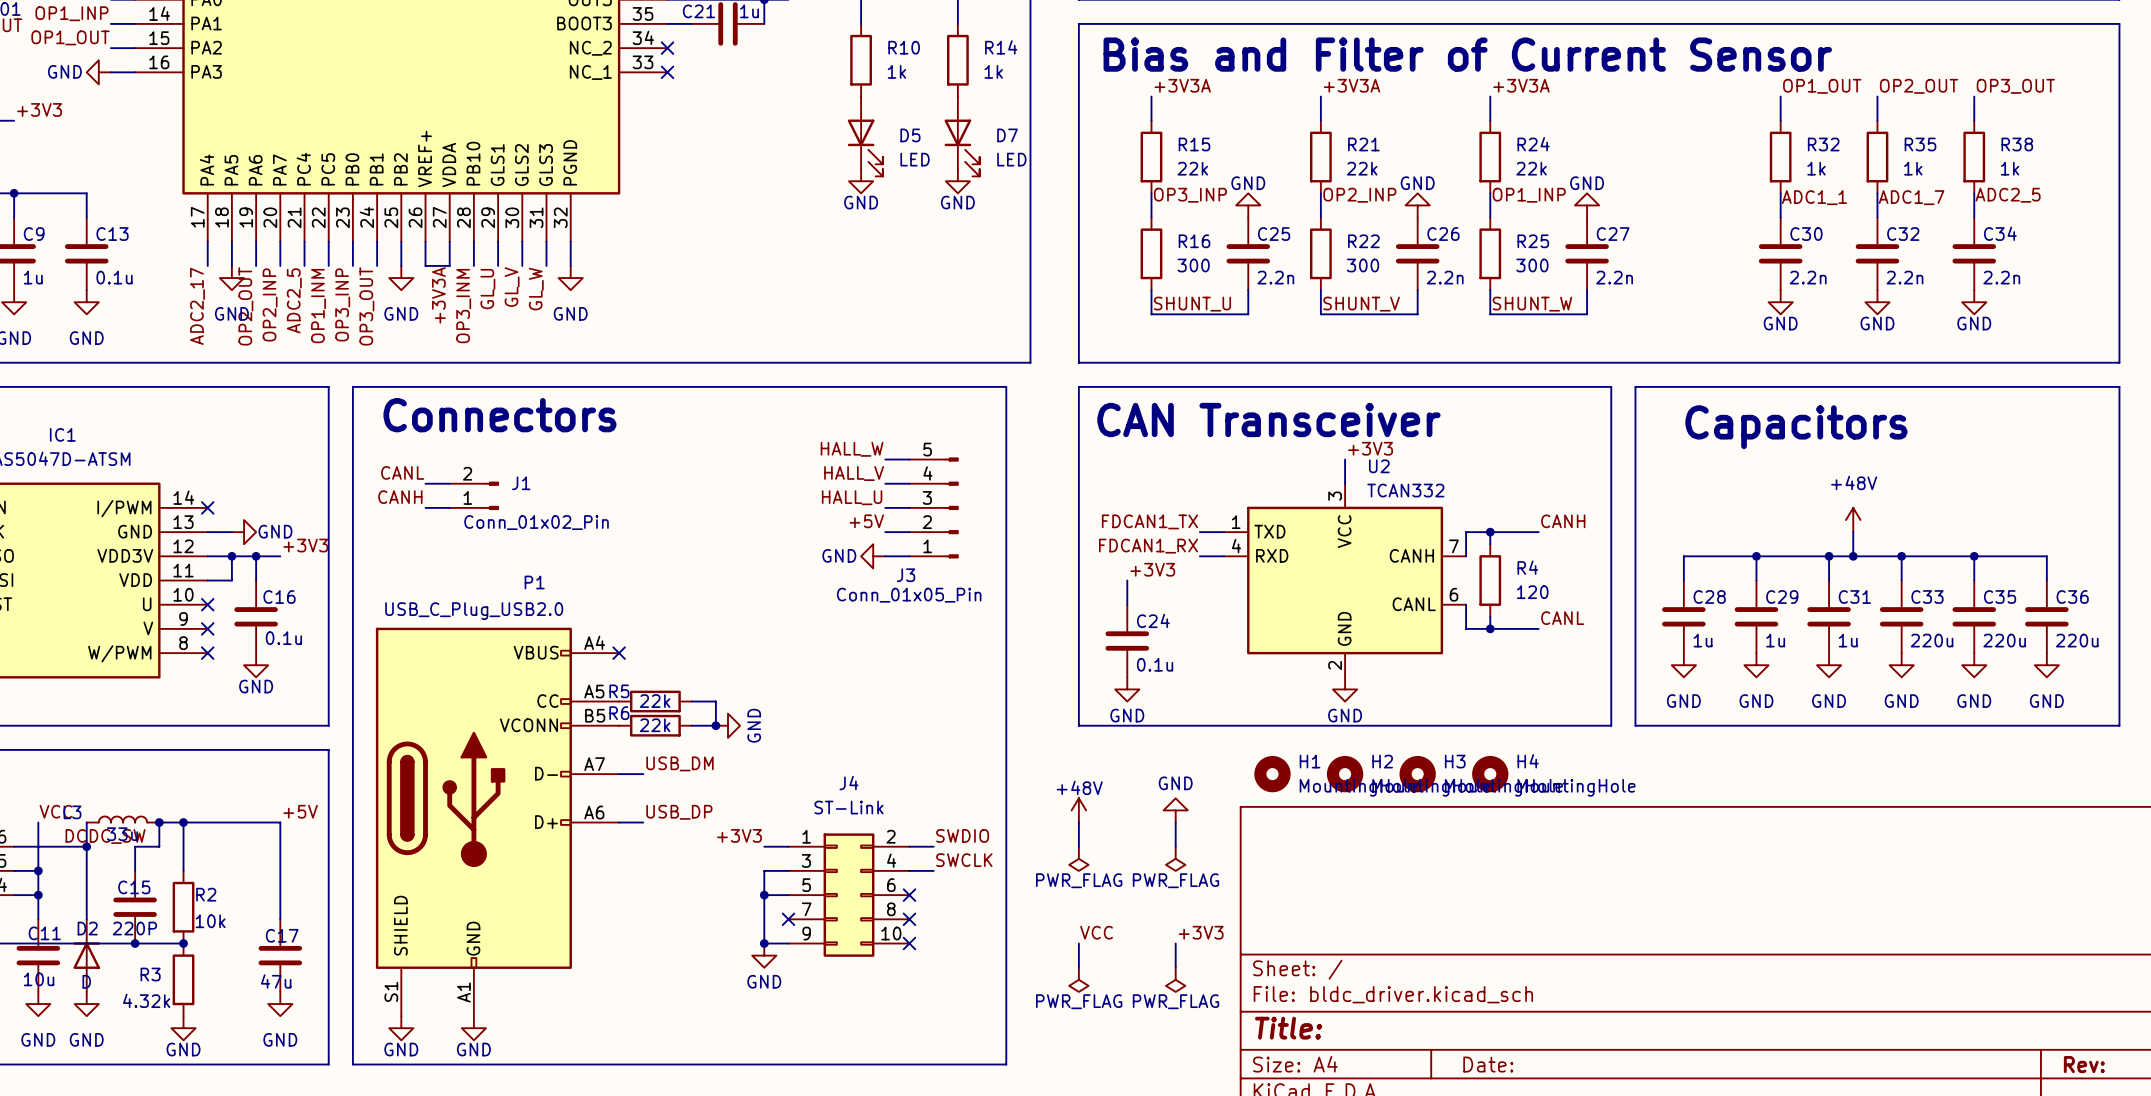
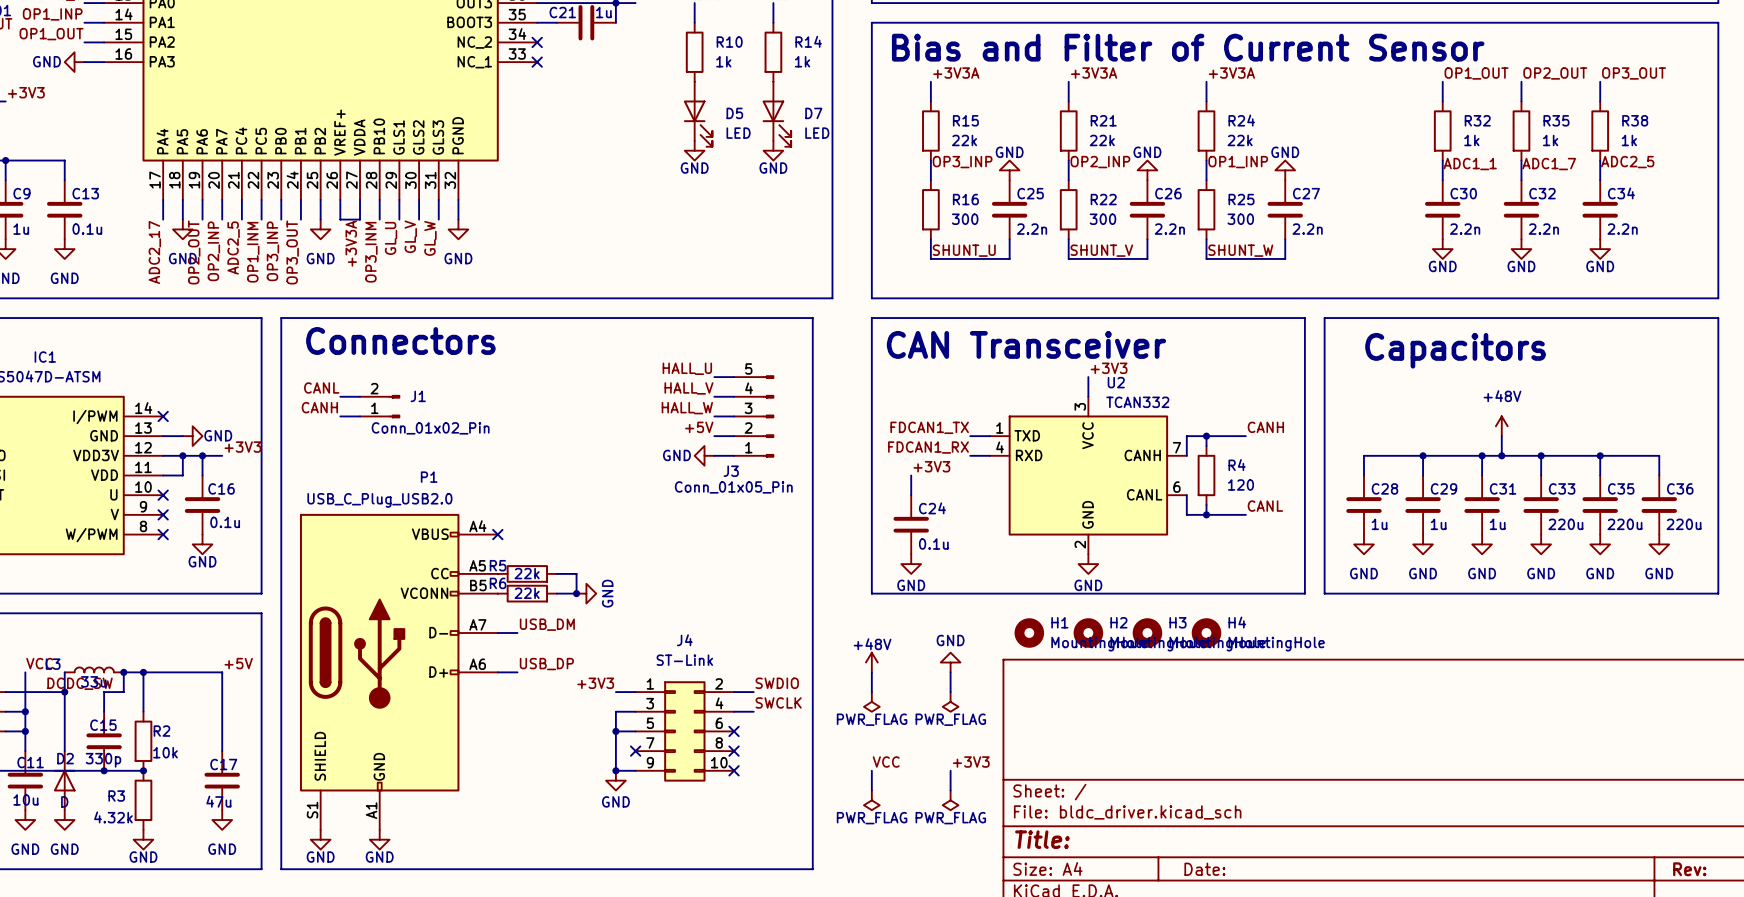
label: HALL_W (852, 449) -> HALL_U (687, 368)
label: HALL_U (852, 497) -> HALL_W (687, 408)
C15 value: 220P (134, 928) -> 330p (103, 760)

